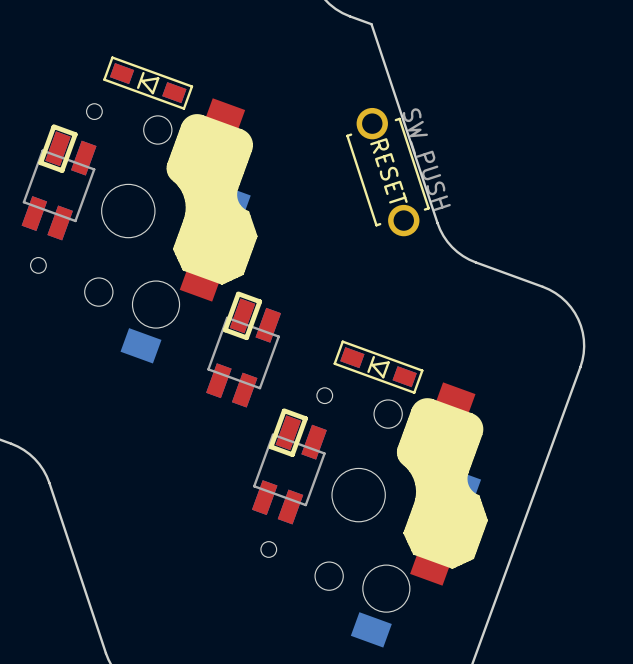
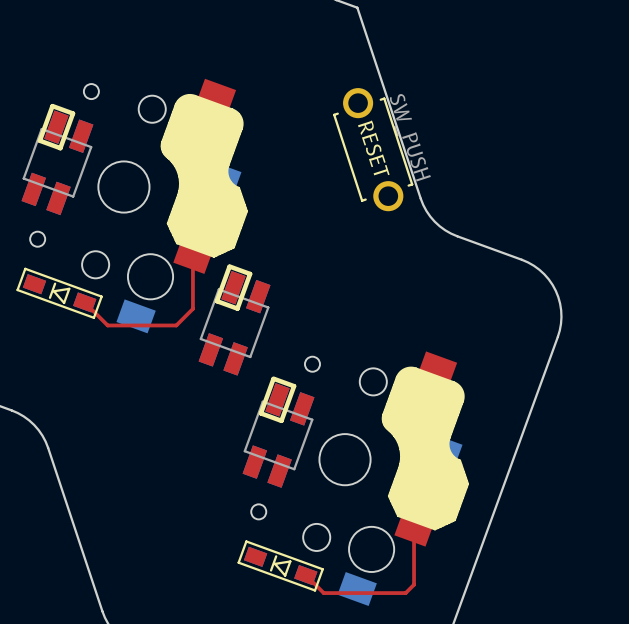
part: (148, 83) -> none
top track: none -> (192, 256) (192, 308) (176, 325) (107, 325) (84, 302)
part: none -> (59, 293)
part: (378, 367) -> none
top track: none -> (414, 529) (414, 584) (405, 593) (323, 593) (305, 575)
part: none -> (280, 565)

